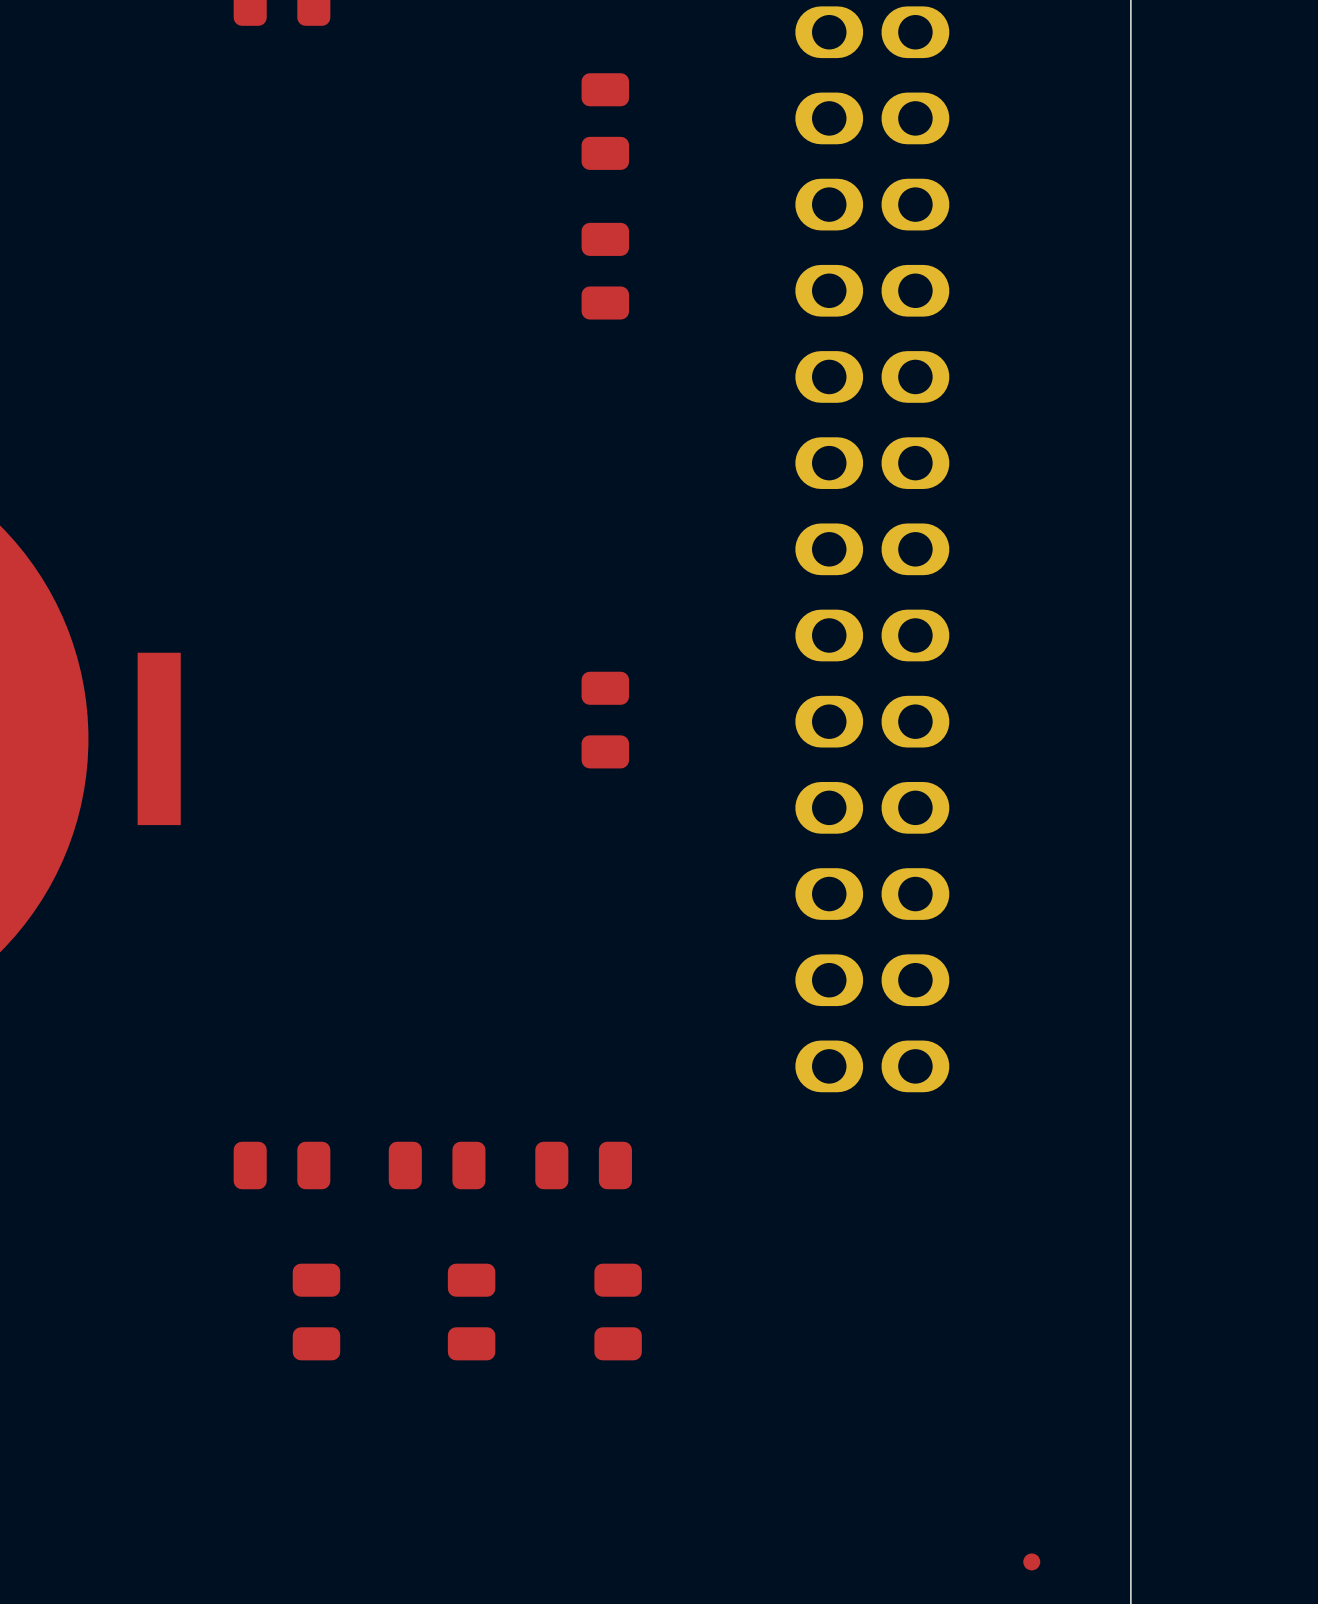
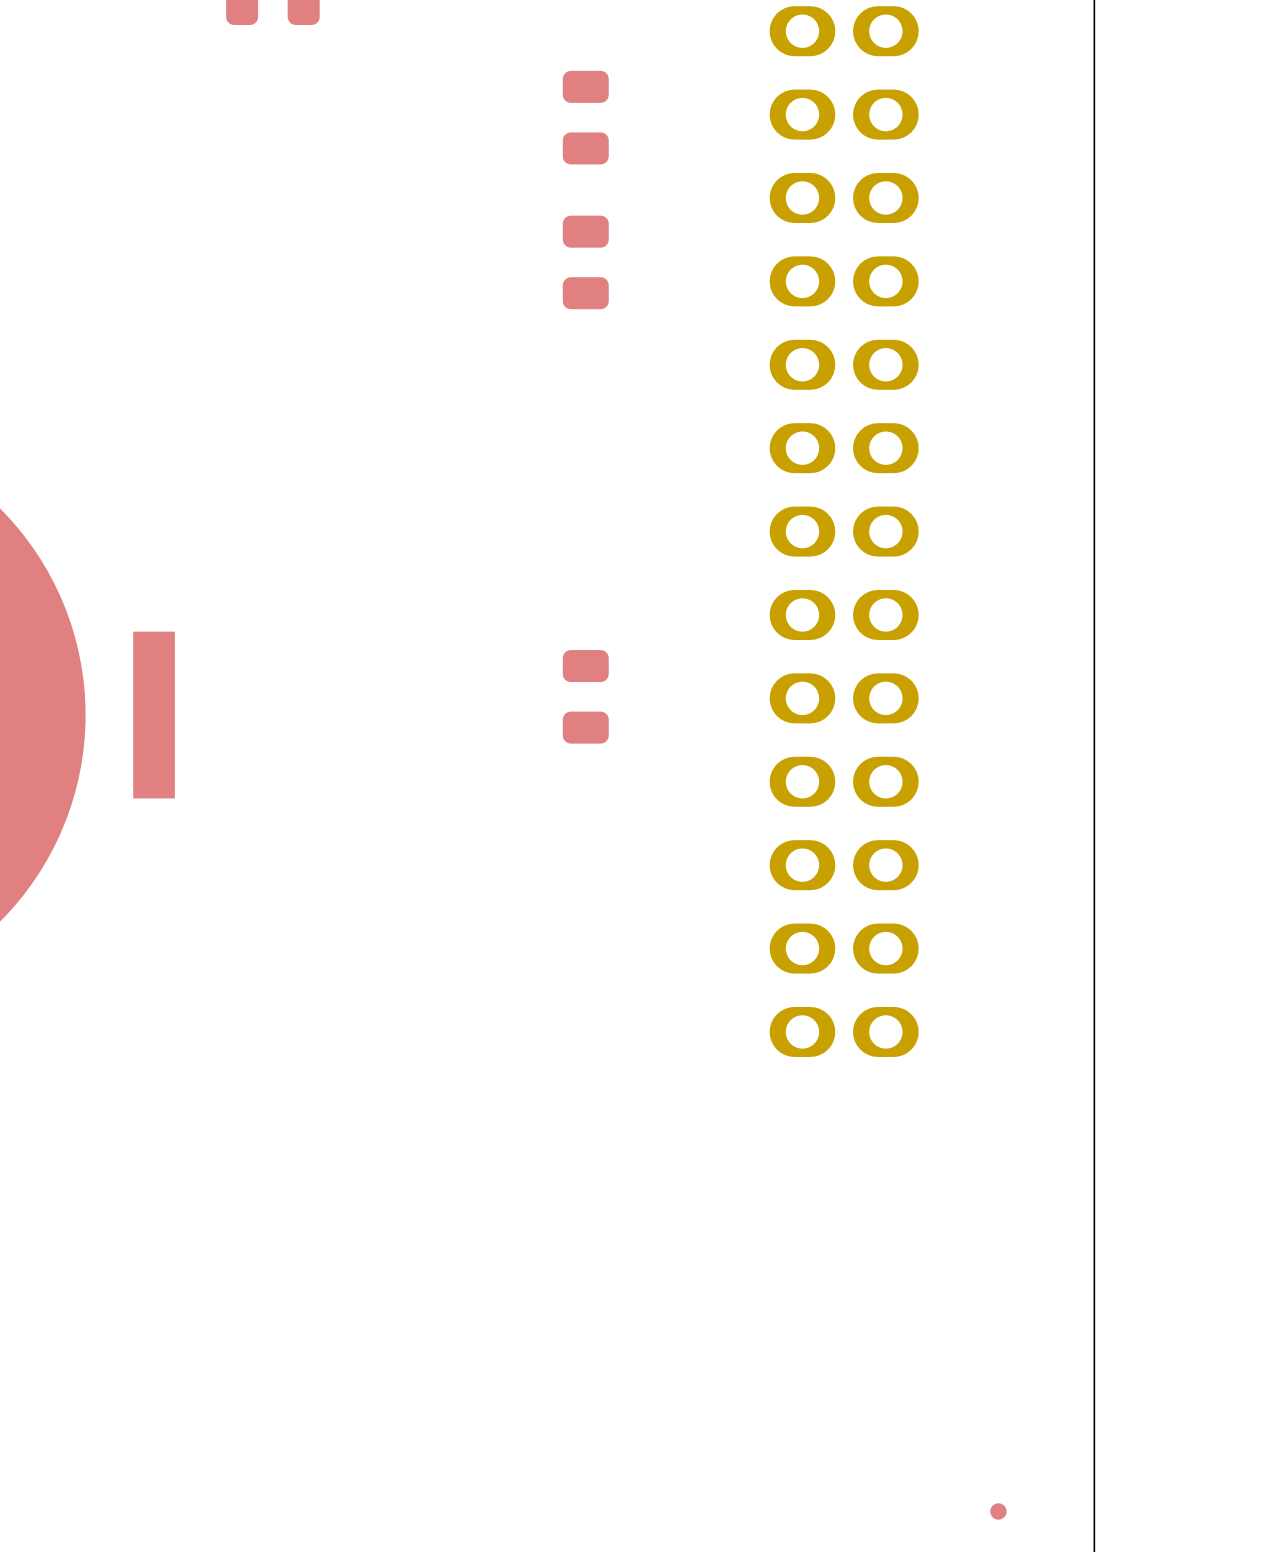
part: (282, 1165) -> none
part: (437, 1165) -> none
part: (583, 1165) -> none
part: (316, 1312) -> none
part: (471, 1312) -> none
part: (618, 1312) -> none

